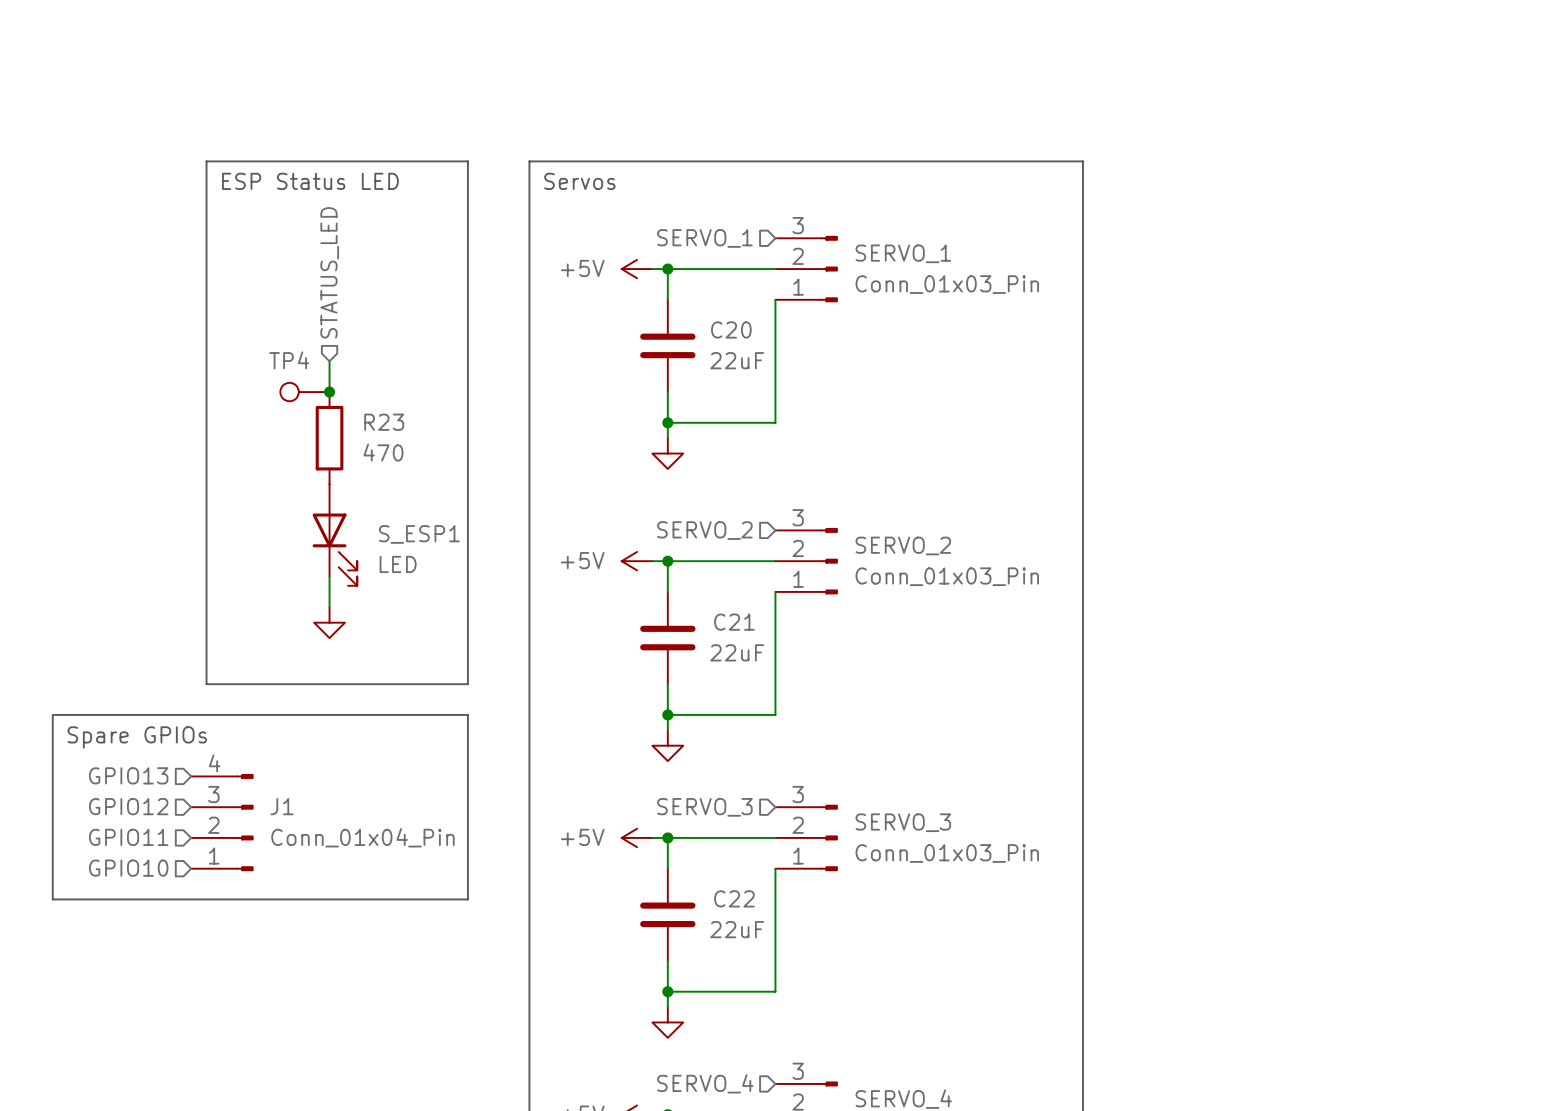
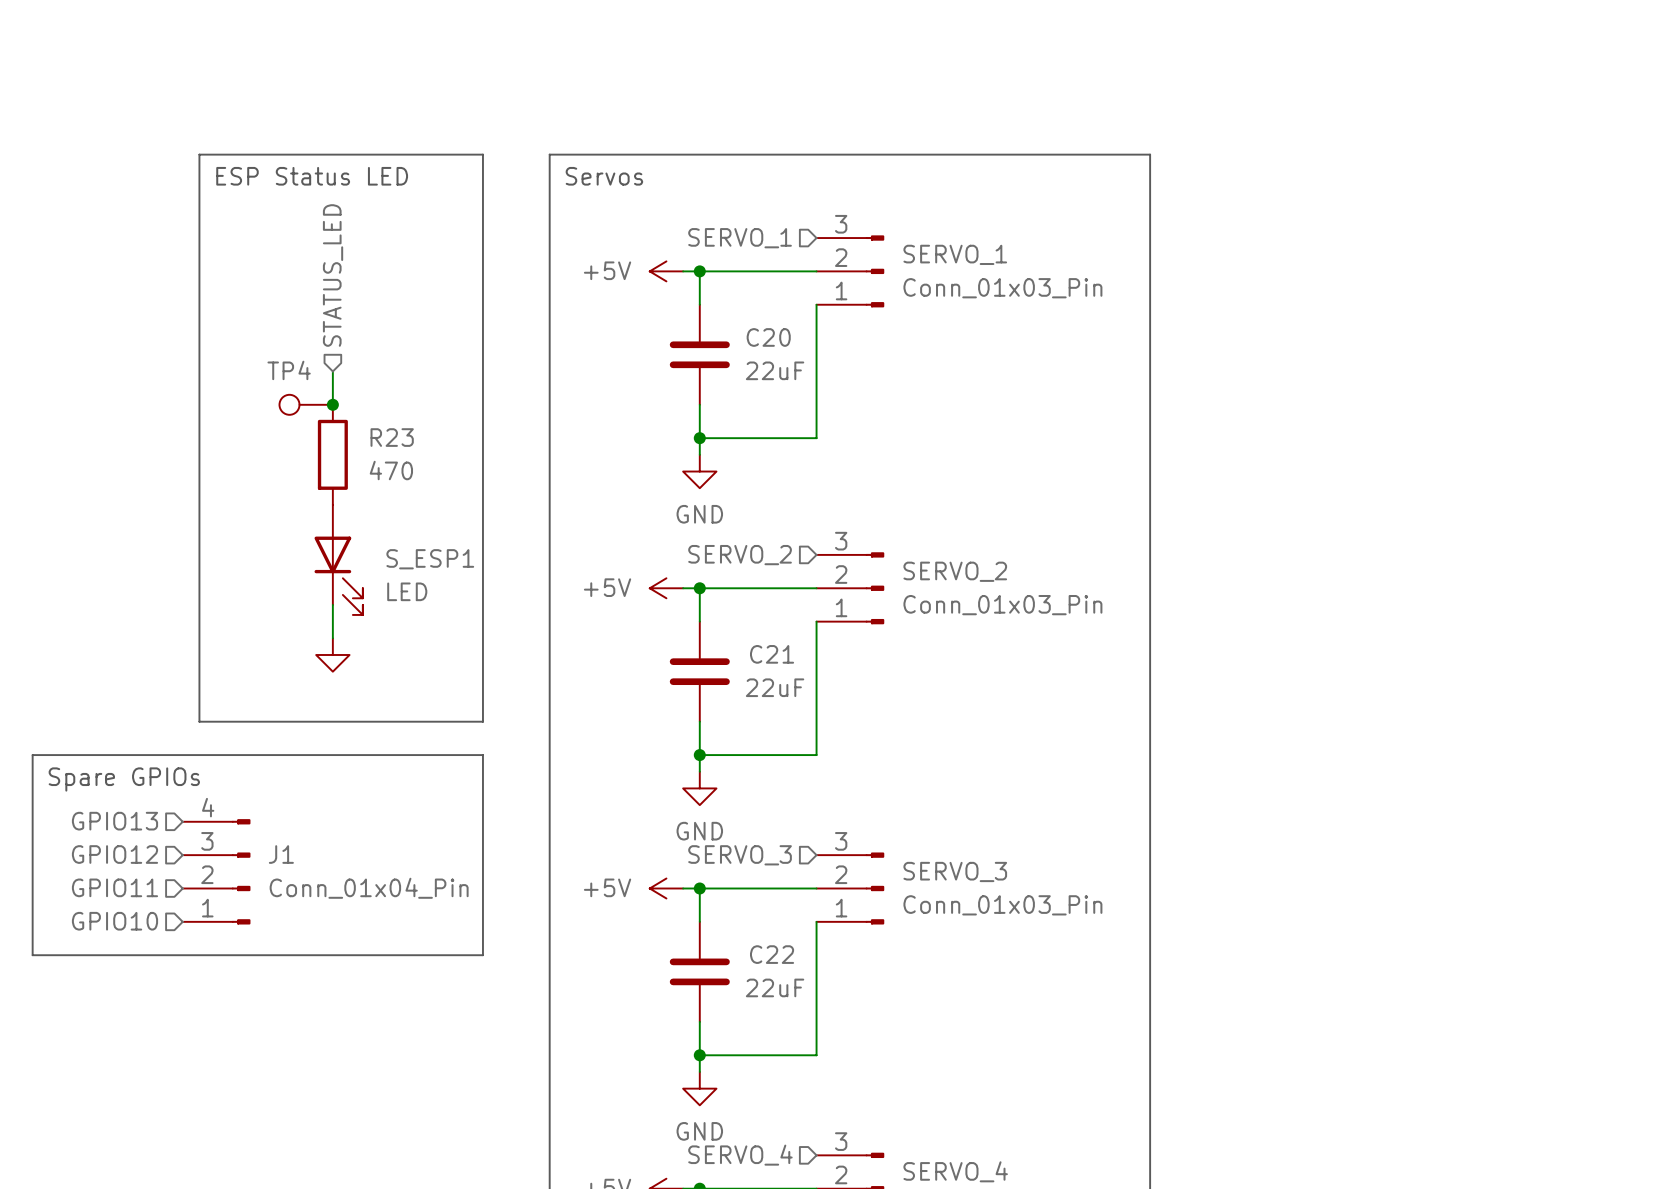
power symbol text: none -> GND (699, 514)
power symbol text: none -> GND (699, 831)
power symbol text: none -> GND (699, 1131)

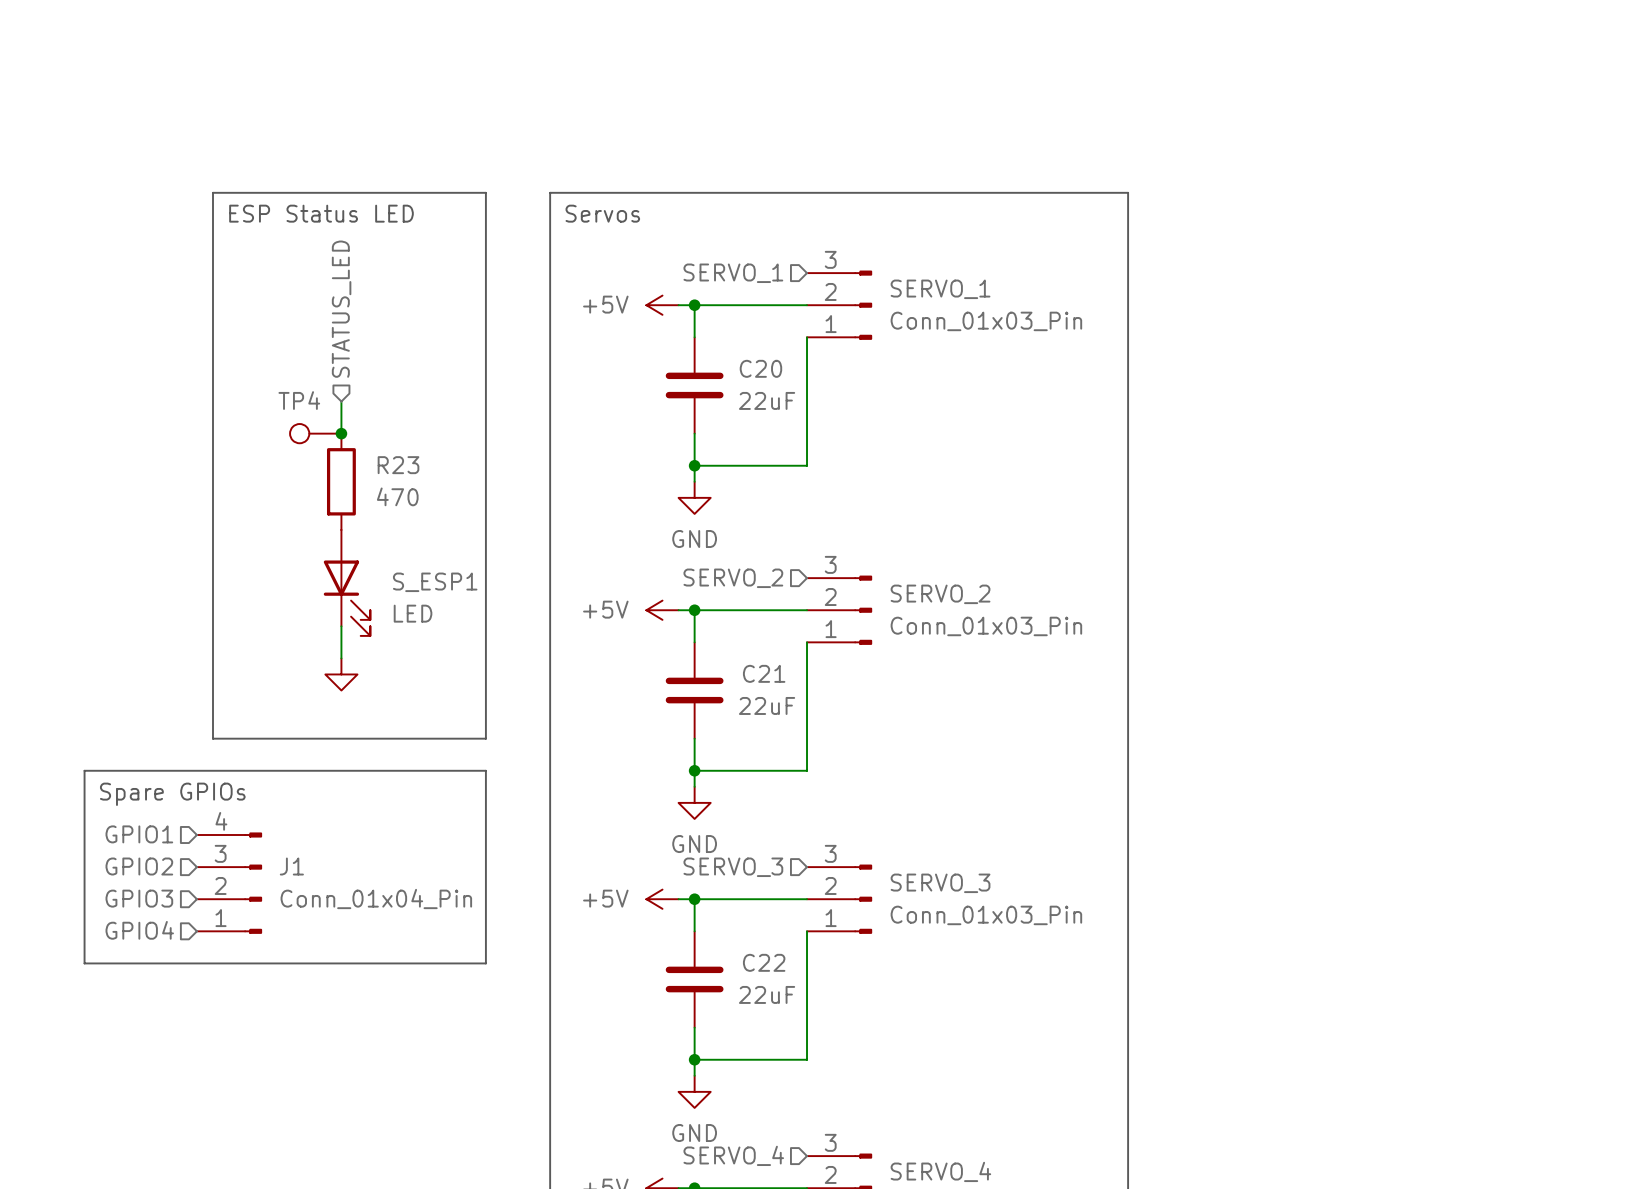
line: (66, 755) (32, 755) (32, 955) (66, 955) -> (84, 770) (84, 963)
text position: Spare GPIOs (124, 779) -> Spare GPIOs (172, 794)
hierarchical label: GPIO13 (114, 821) -> GPIO1 (139, 834)
hierarchical label: GPIO12 (114, 854) -> GPIO2 (139, 866)
hierarchical label: GPIO11 (114, 887) -> GPIO3 (139, 898)
hierarchical label: GPIO10 (114, 921) -> GPIO4 (139, 930)

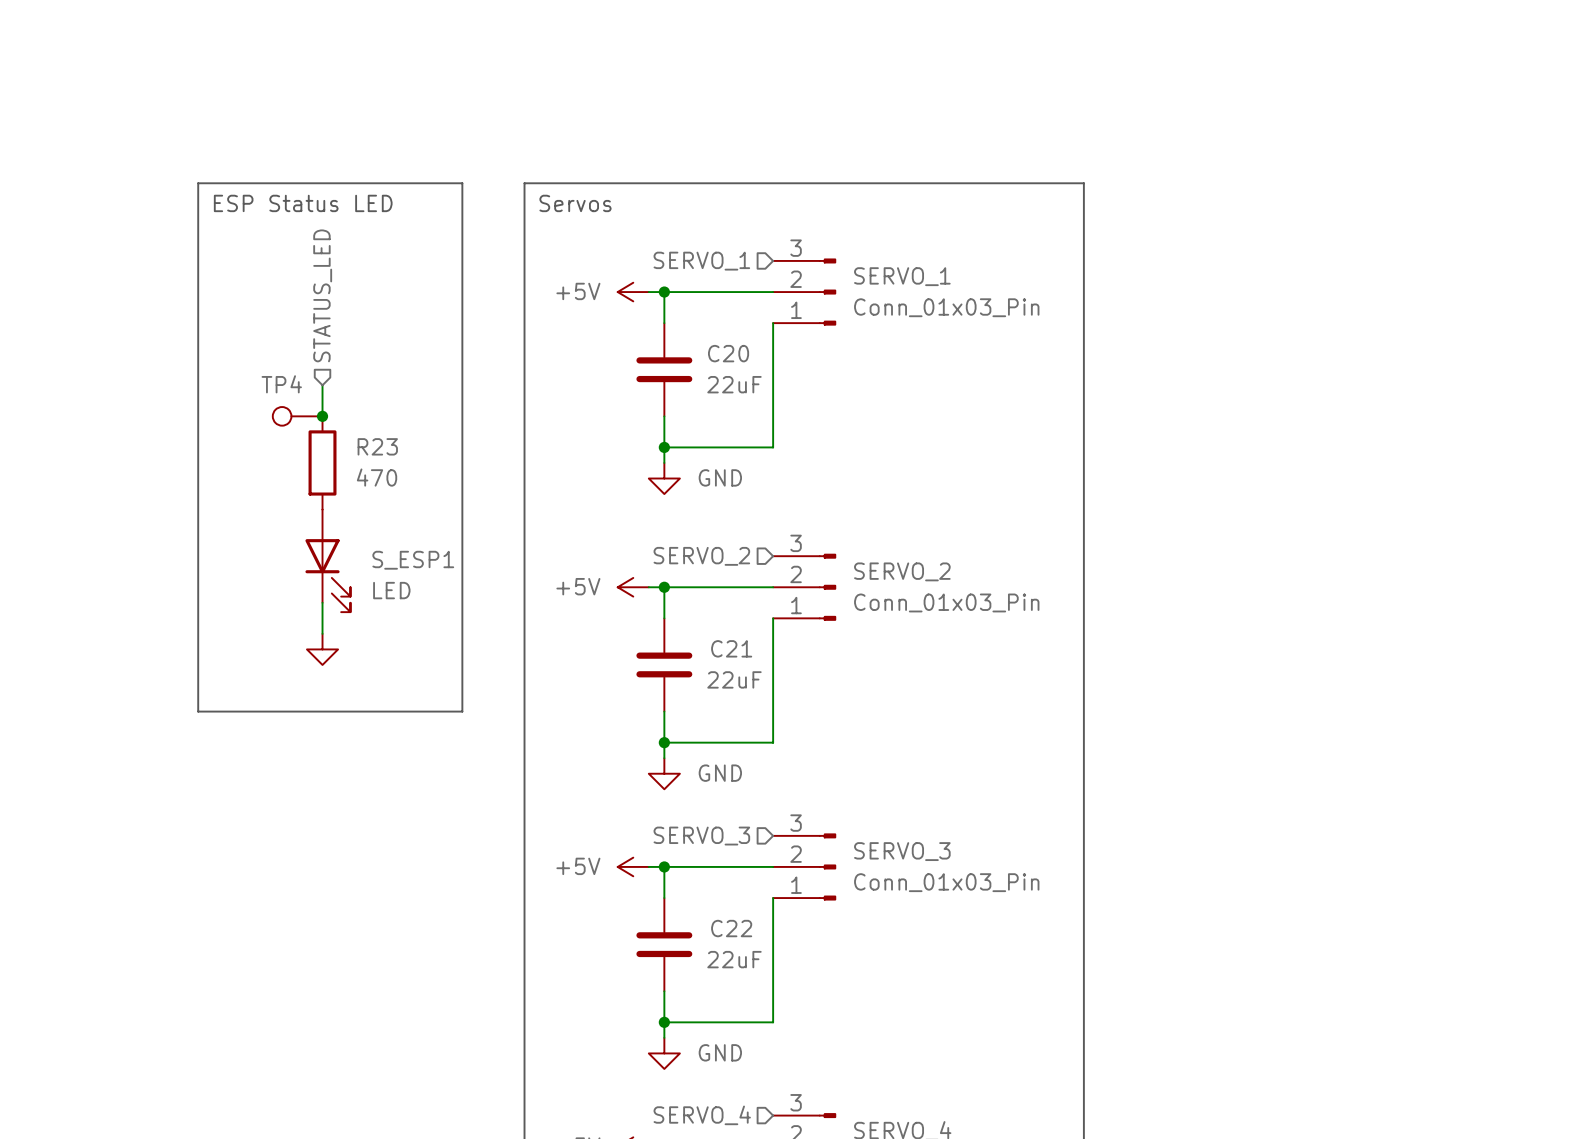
power symbol text position: GND (694, 539) -> GND (720, 477)
line: (84, 770) (485, 770) (485, 963) (84, 963) (84, 770) -> none
text: Spare GPIOs (172, 794) -> none
hierarchical label: GPIO1 (139, 834) -> none
power symbol text position: GND (694, 844) -> GND (720, 773)
hierarchical label: GPIO2 (139, 866) -> none
J1: Conn_01x04_Pin (229, 883) -> none
hierarchical label: GPIO3 (139, 898) -> none
hierarchical label: GPIO4 (139, 930) -> none
power symbol text position: GND (694, 1133) -> GND (720, 1052)

